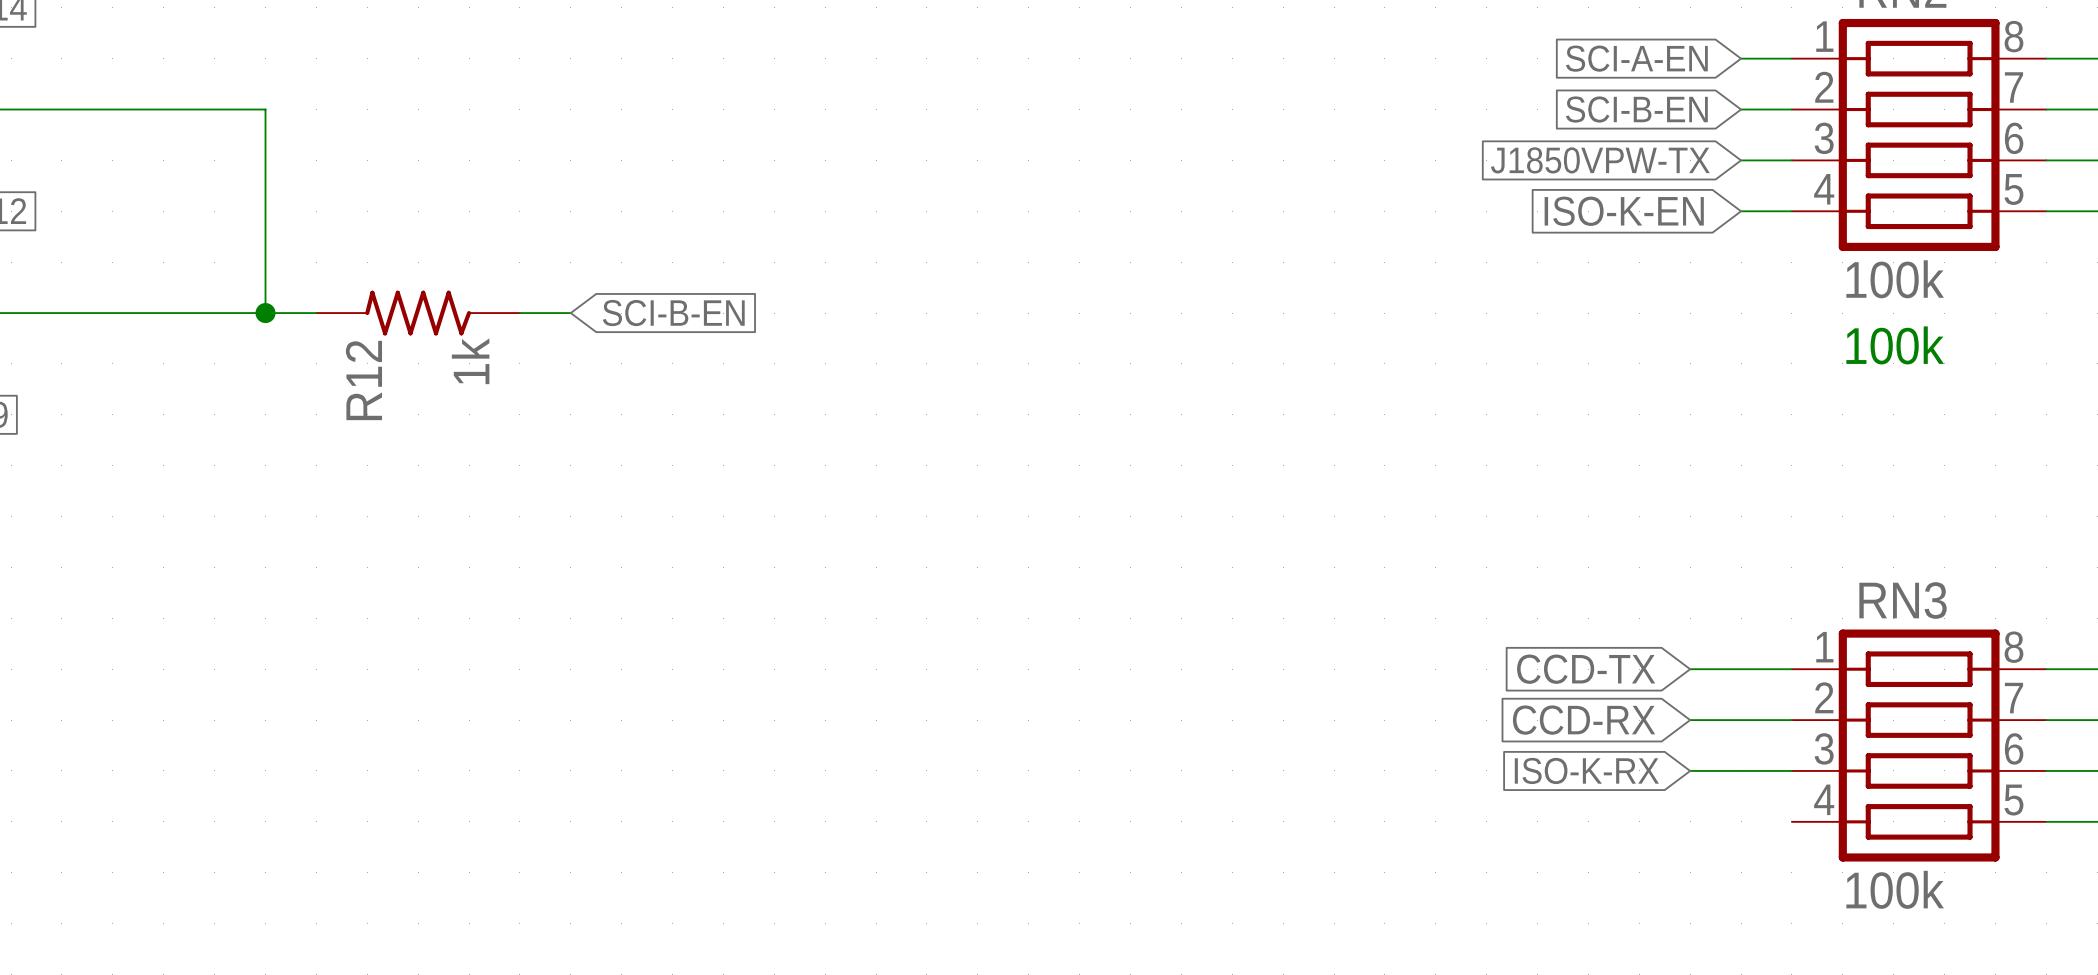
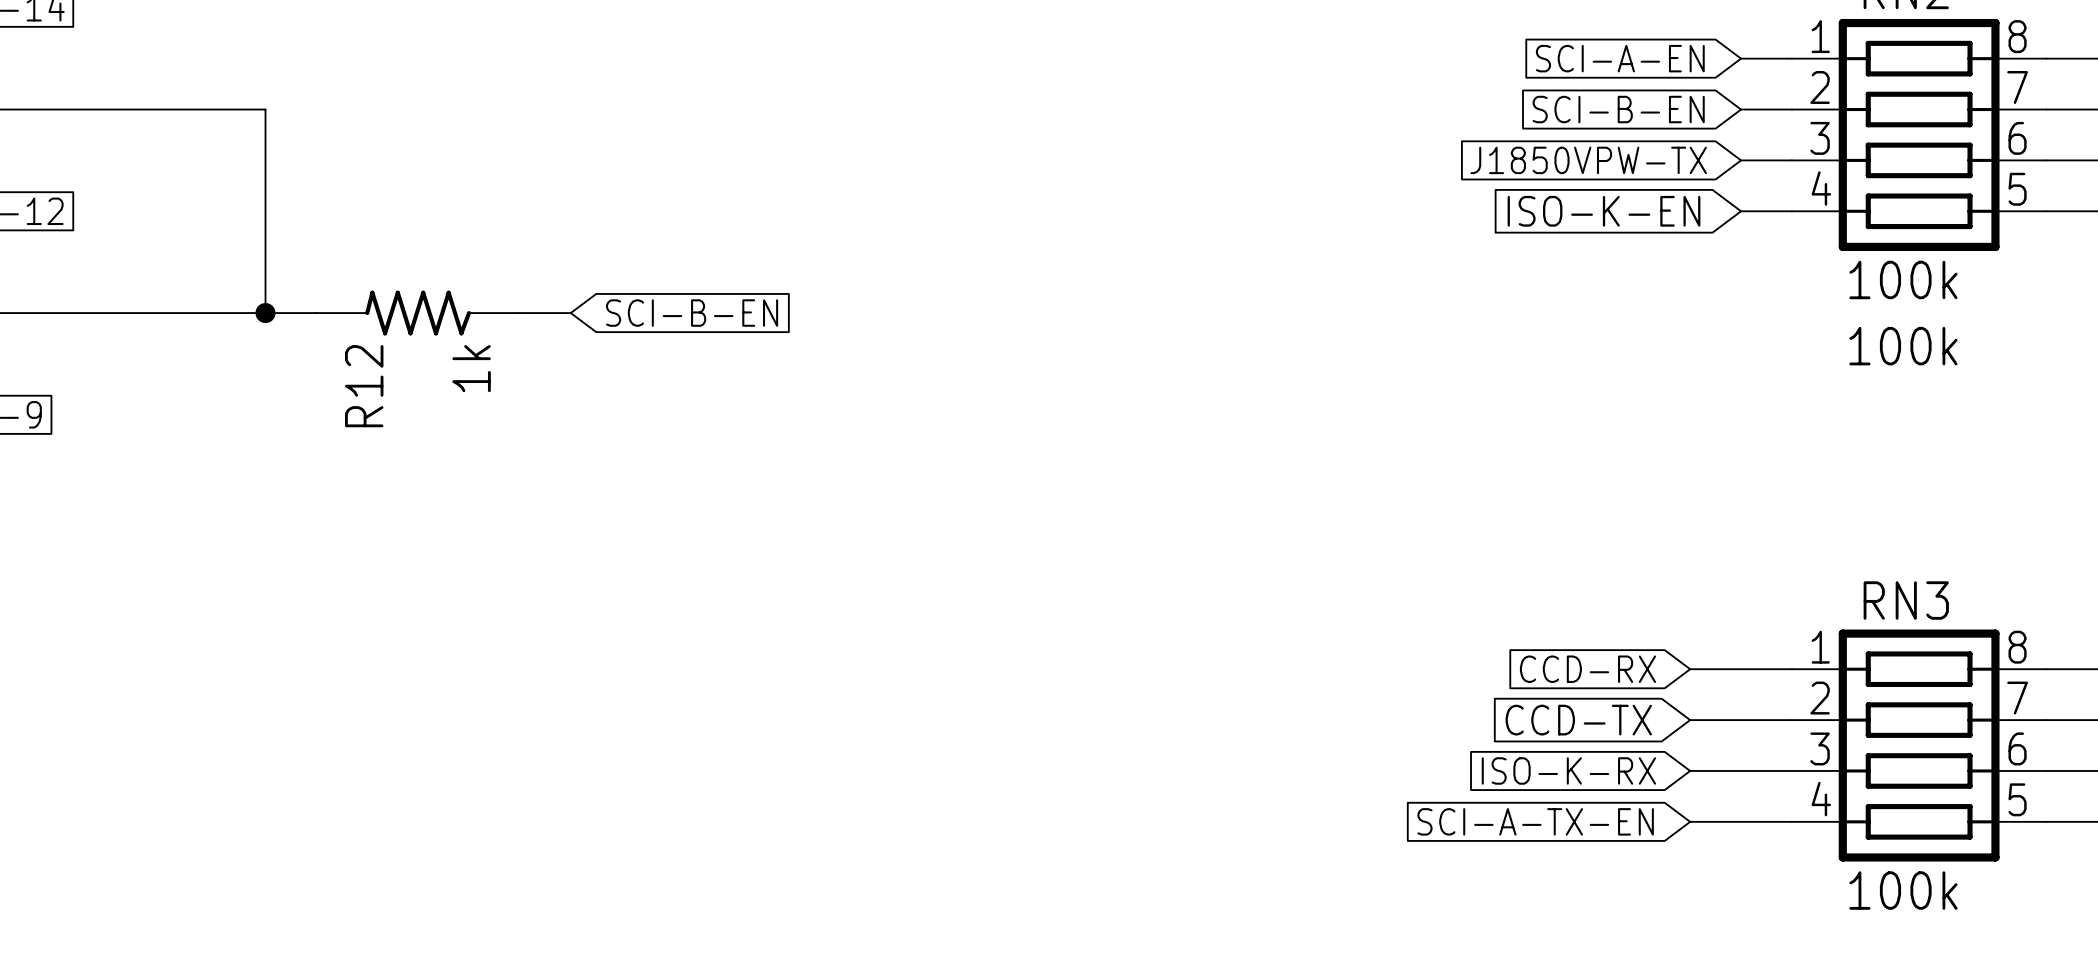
global label: CCD-TX (1586, 669) -> CCD-RX (1587, 669)
global label: CCD-RX (1584, 720) -> CCD-TX (1578, 720)
global label: none -> SCI-A-TX-EN (1535, 821)
wire: none -> (1690, 821) (1791, 821)

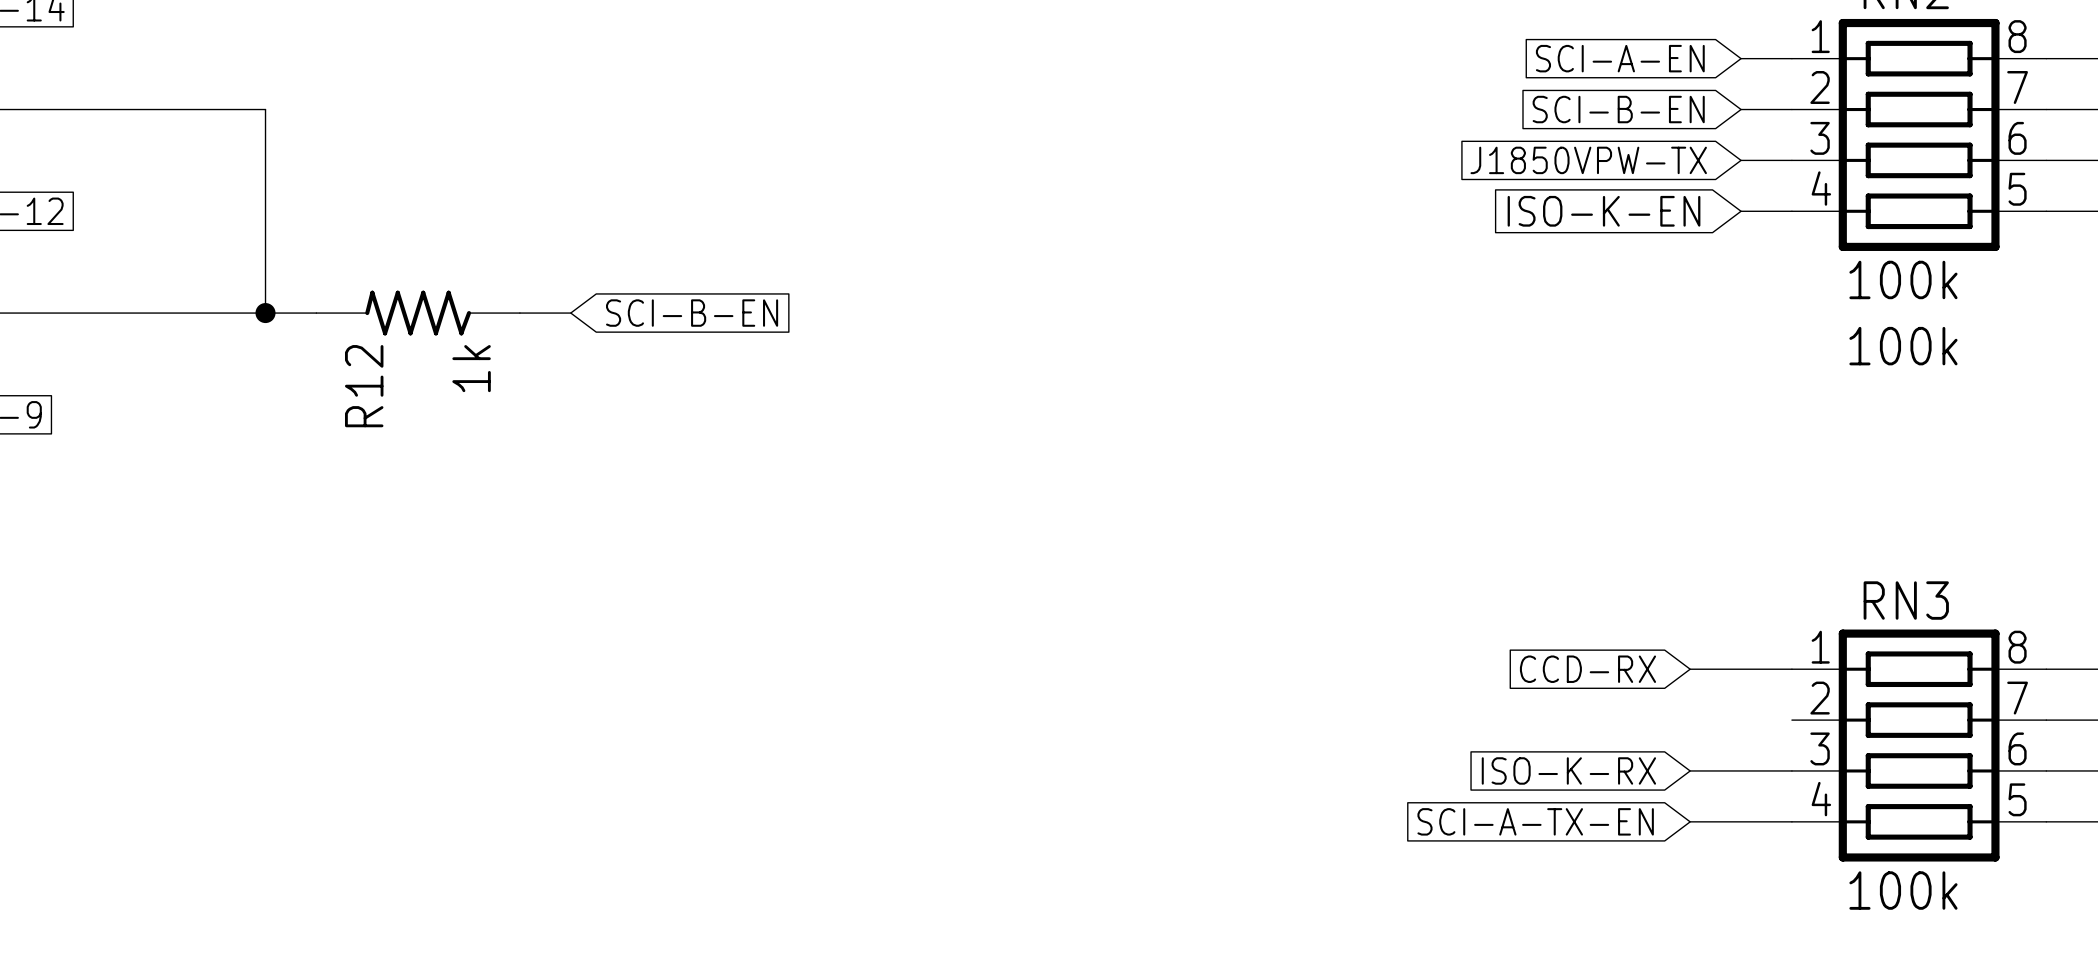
global label: CCD-TX (1578, 720) -> none
wire: (1690, 720) (1791, 720) -> none

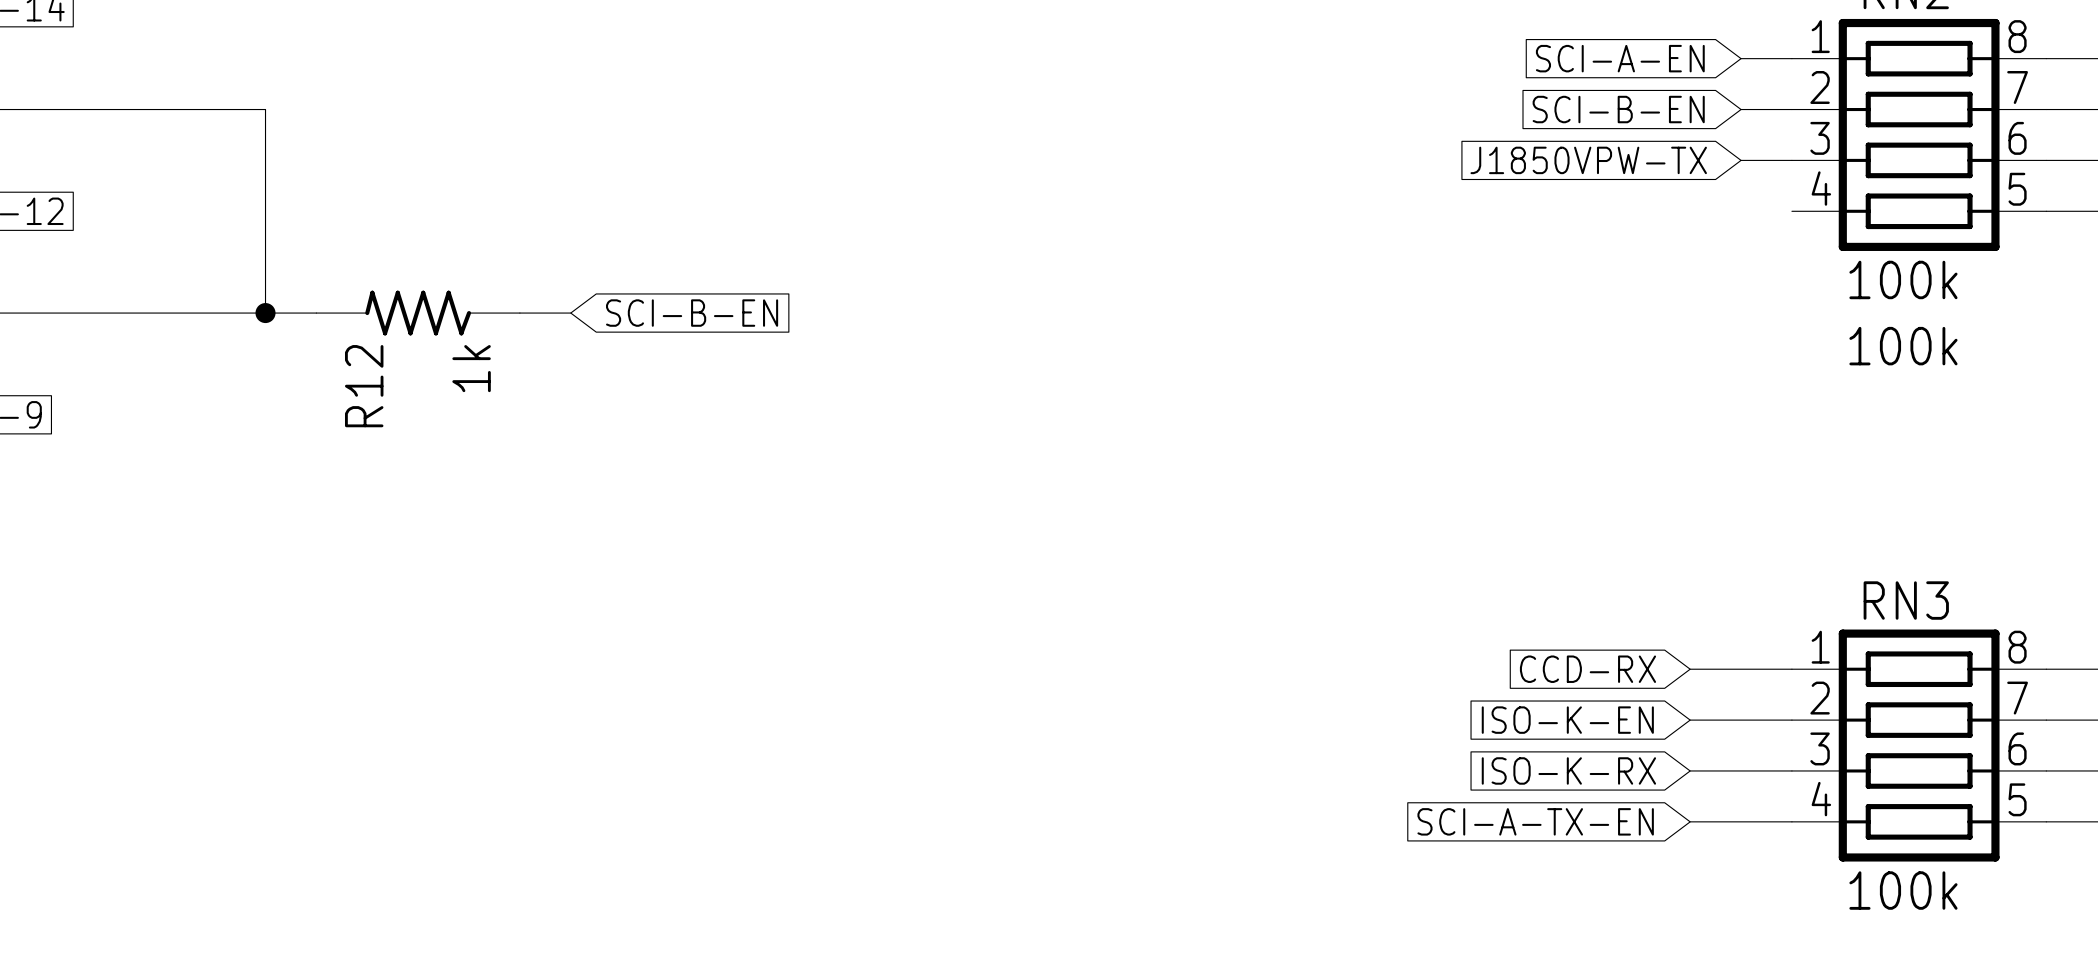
global label: ISO-K-EN (1604, 211) -> none
wire: (1741, 211) (1791, 211) -> none
global label: none -> ISO-K-EN (1567, 720)
wire: none -> (1690, 720) (1791, 720)

